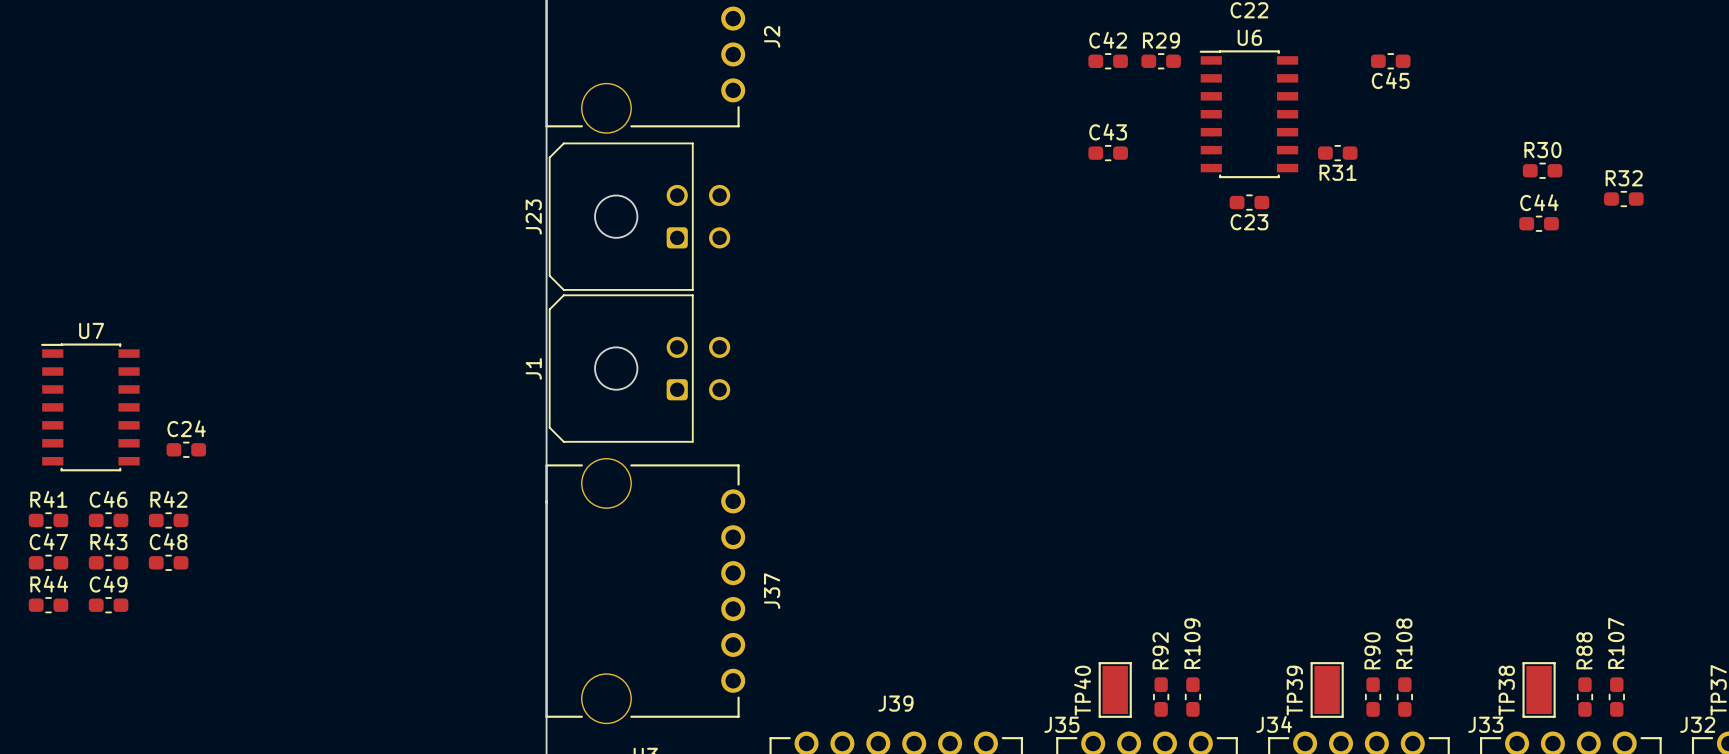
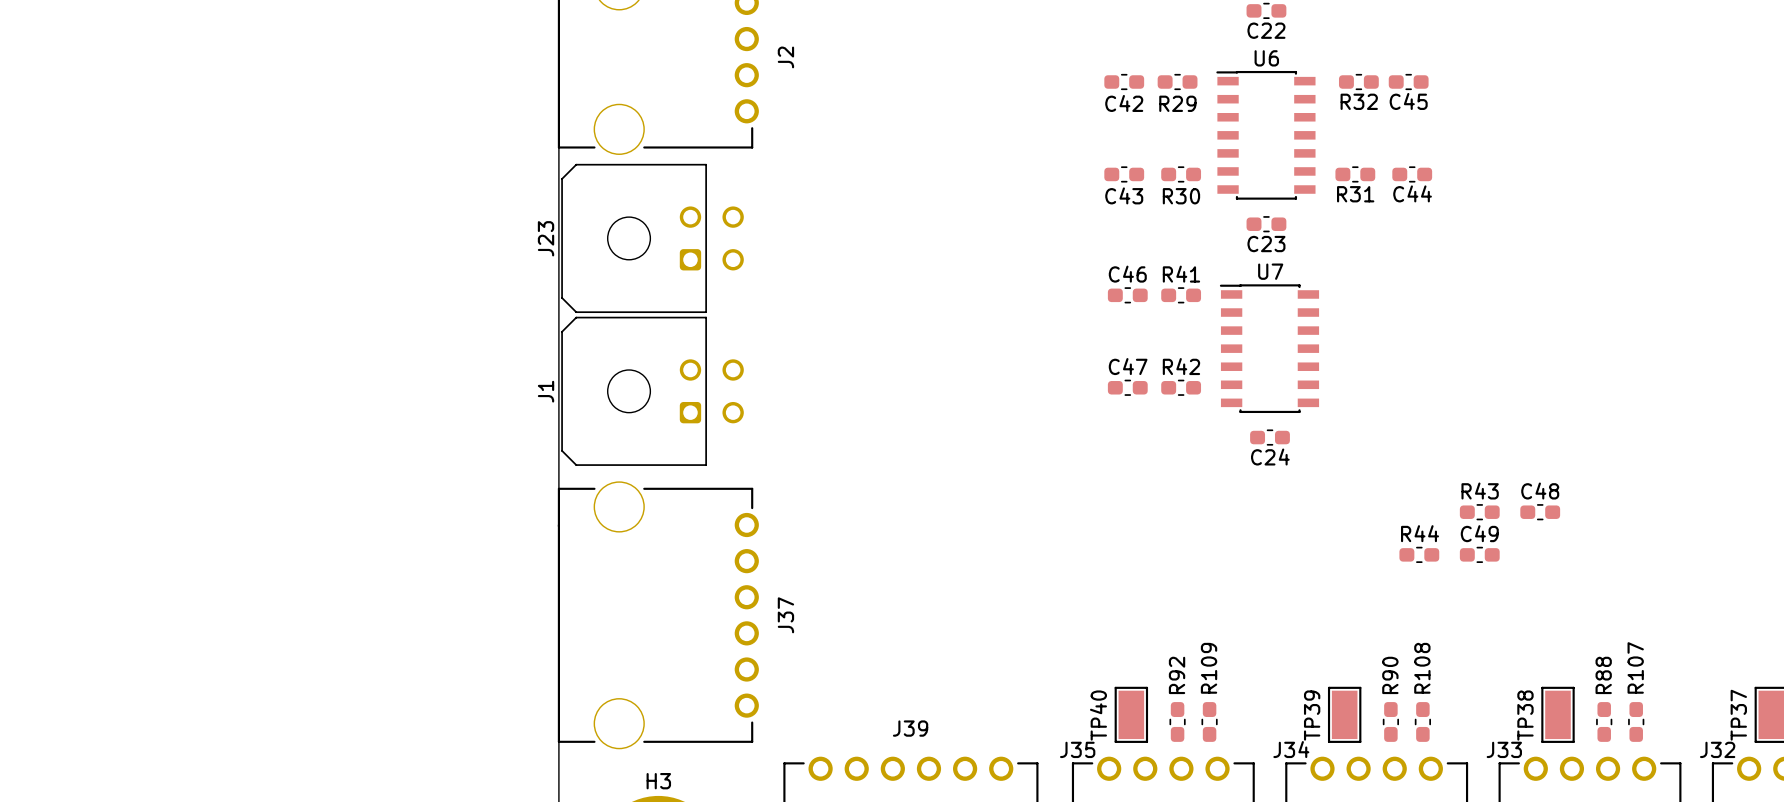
C42 name position: C42 (1108, 40) -> C42 (1124, 103)
R29 name position: R29 (1161, 40) -> R29 (1177, 103)
C43 name position: C43 (1108, 132) -> C43 (1124, 195)
R30 name position: R30 (1542, 150) -> R30 (1181, 196)
R30 position: (1542, 170) -> (1181, 174)
R32 name position: R32 (1624, 178) -> R32 (1359, 101)
R32 position: (1623, 199) -> (1358, 82)
C44 name position: C44 (1539, 202) -> C44 (1412, 193)
C44 position: (1539, 223) -> (1412, 174)
U7 position: (90, 407) -> (1269, 348)
C24 name position: C24 (186, 428) -> C24 (1270, 457)
C24 position: (186, 449) -> (1270, 437)
R41 position: (48, 520) -> (1181, 295)
C46 position: (108, 520) -> (1127, 295)
R42 position: (168, 520) -> (1181, 387)
C47 position: (48, 562) -> (1127, 387)
R43 position: (108, 562) -> (1479, 512)
C48 position: (168, 562) -> (1540, 512)
R44 position: (48, 605) -> (1419, 554)
C49 position: (108, 605) -> (1479, 554)

